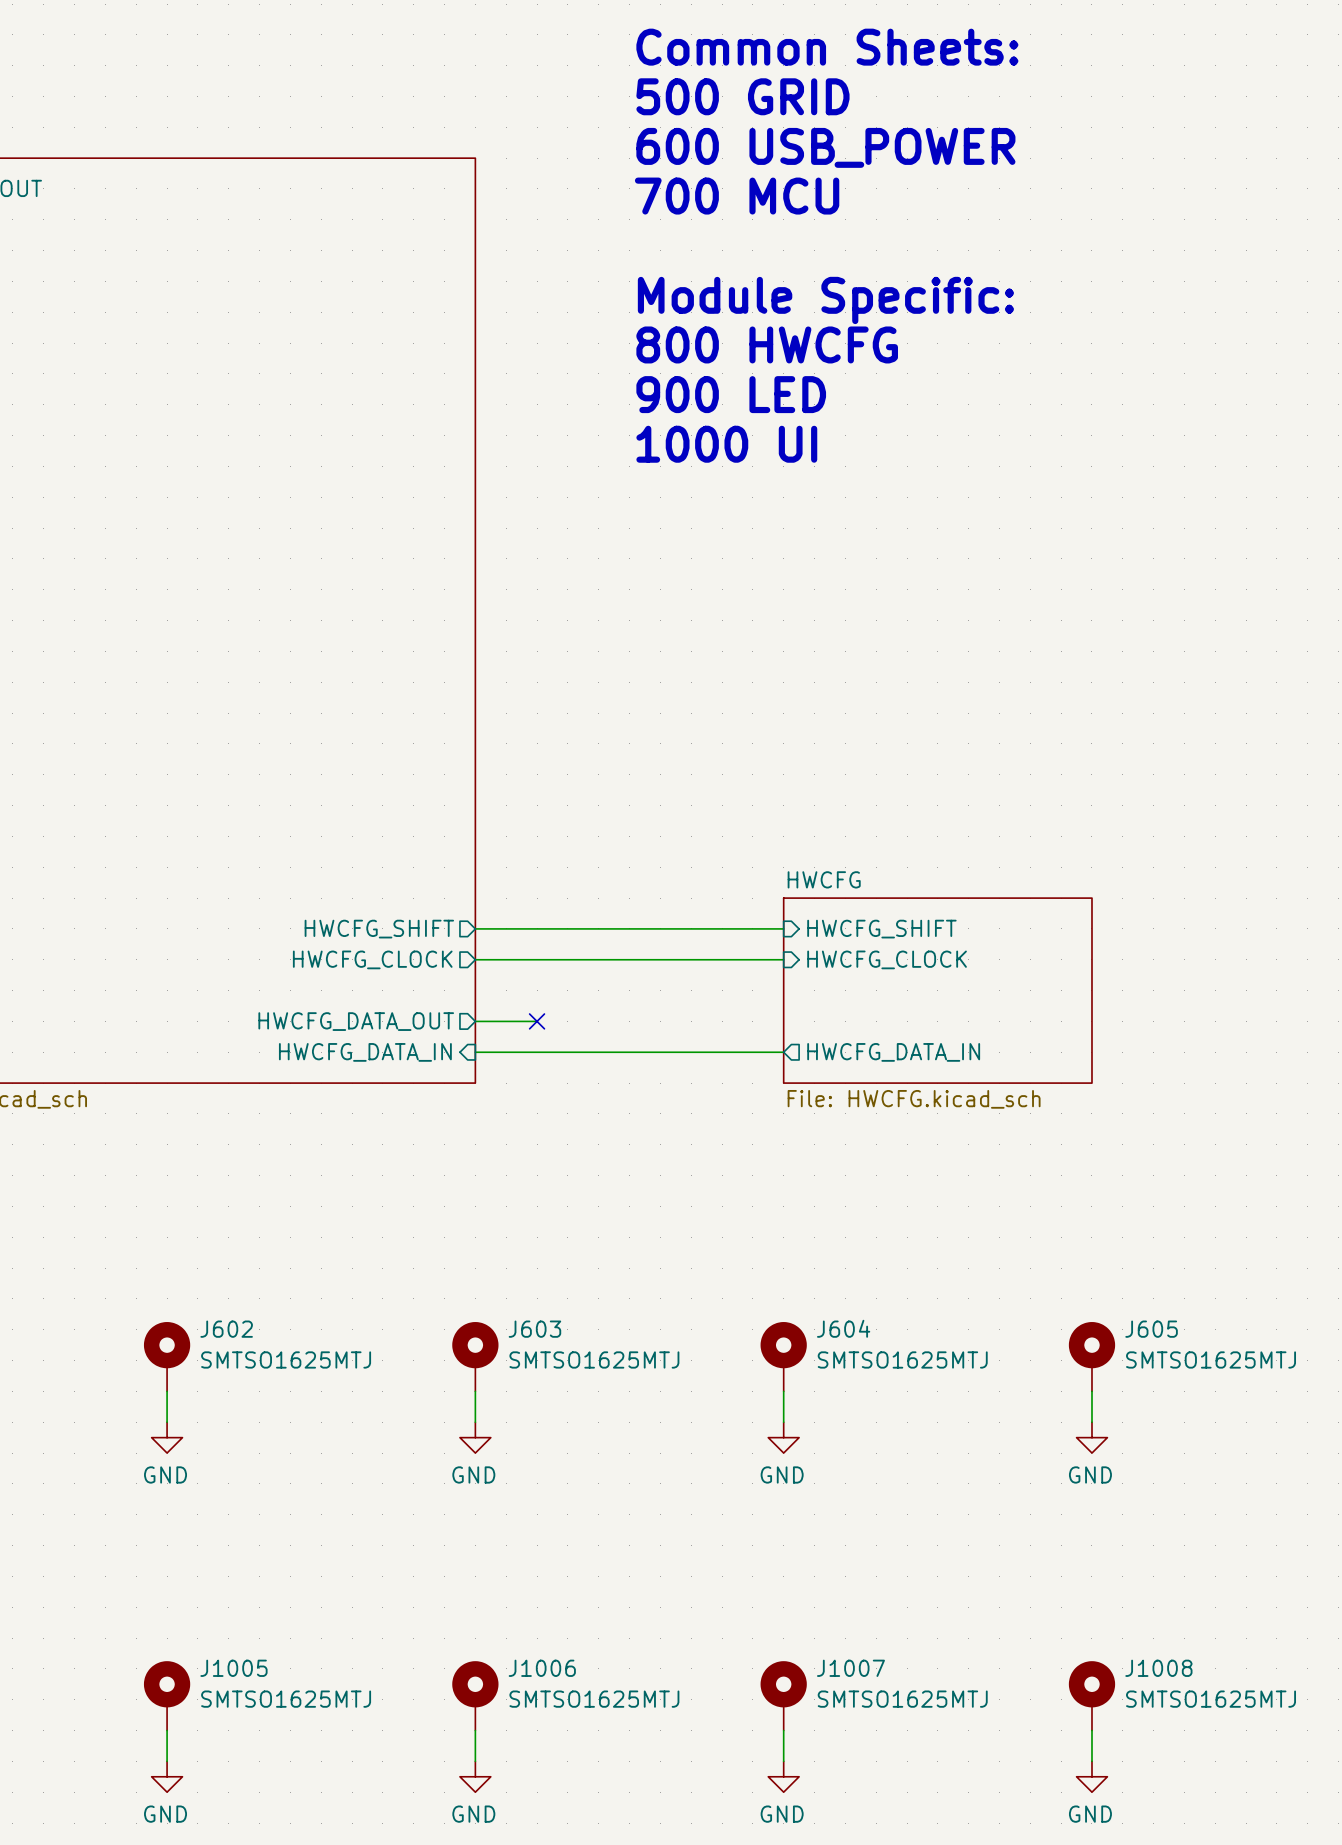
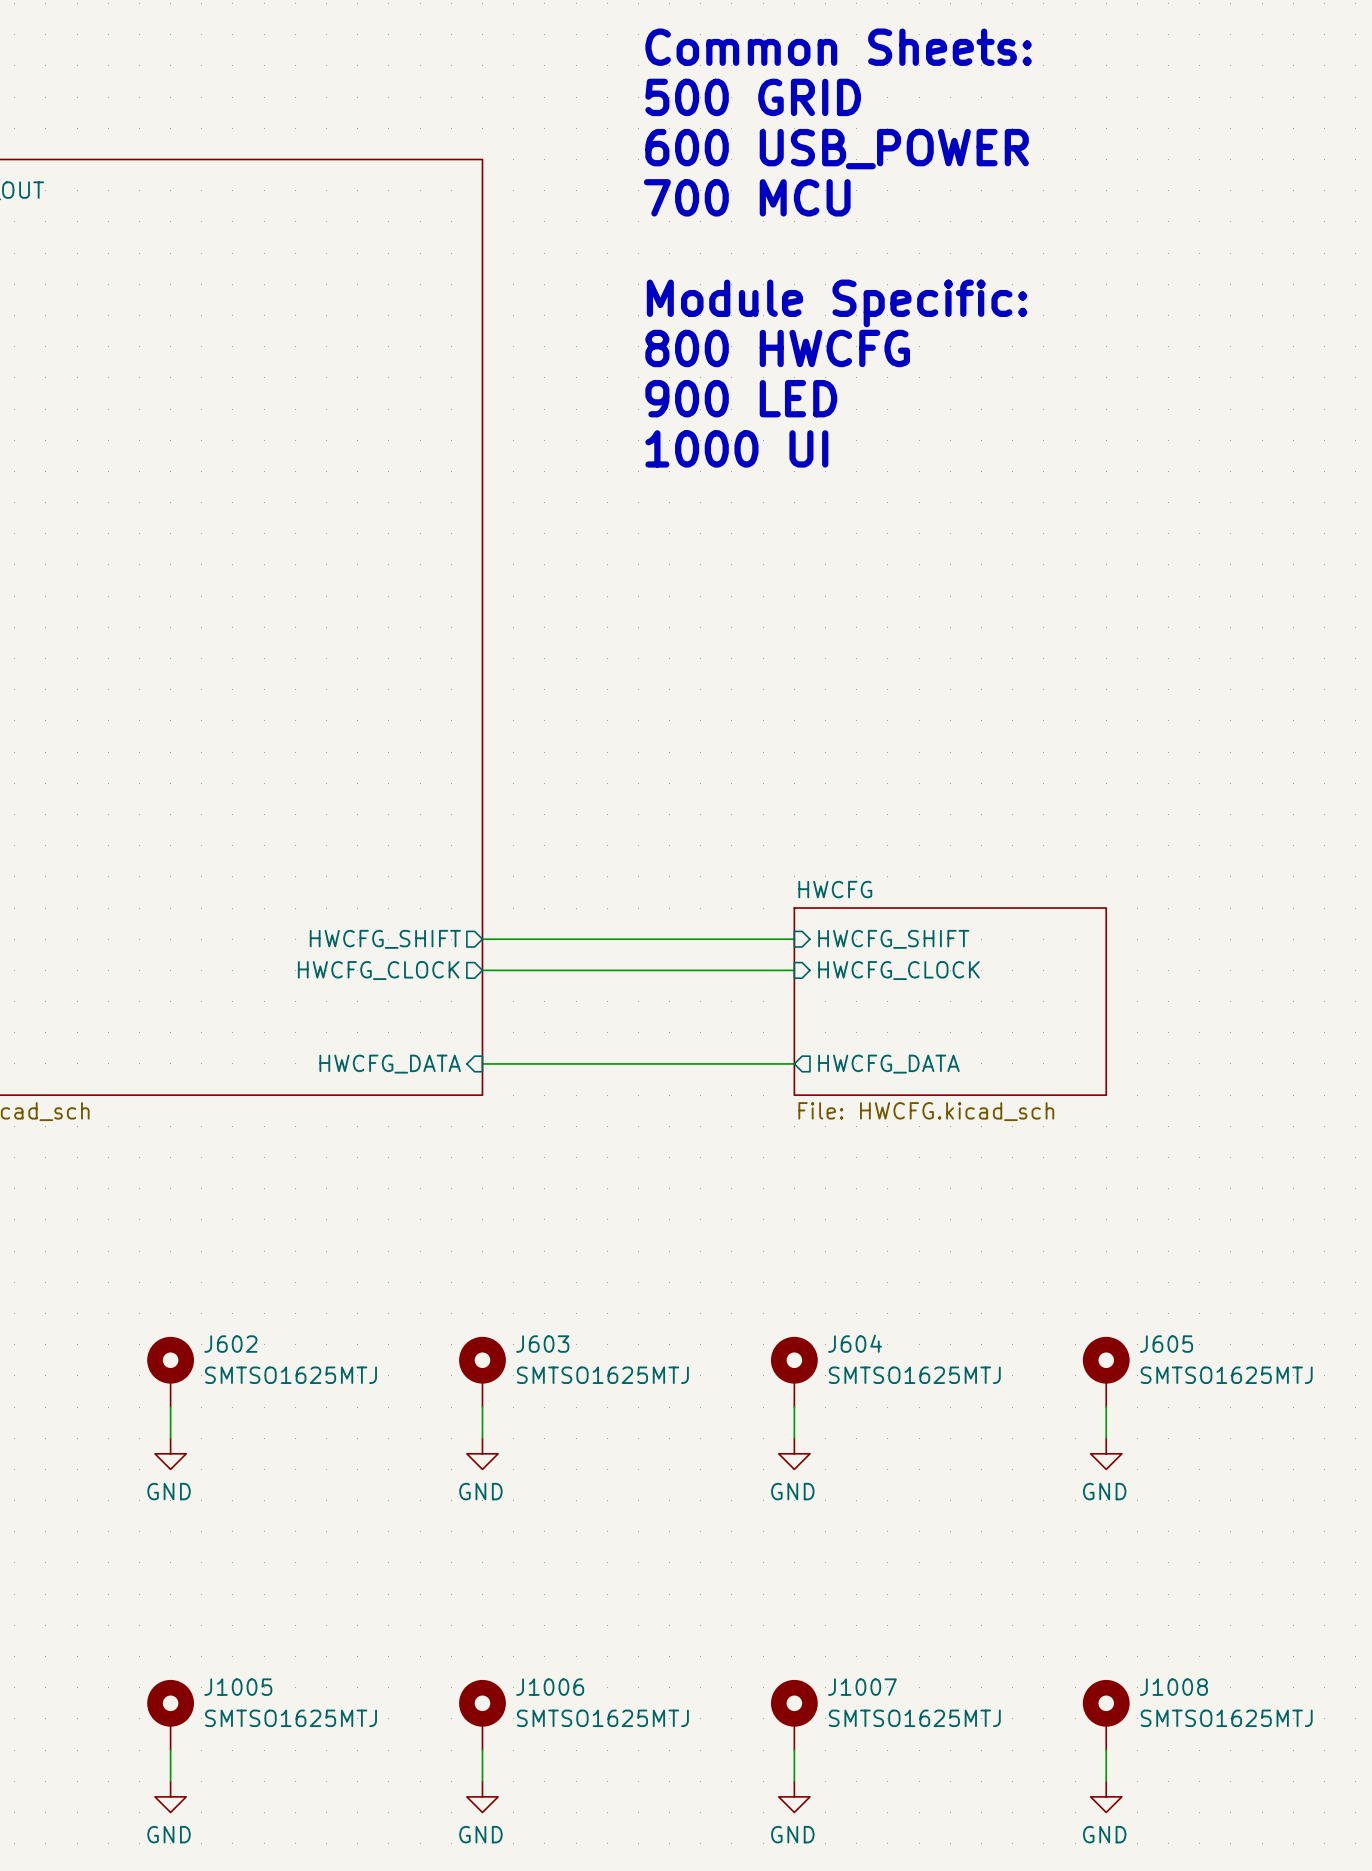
sheet pin: HWCFG_DATA_OUT (356, 1021) -> none
wire: (475, 1021) (537, 1021) -> none
no-connect mark: (537, 1021) -> none
sheet pin: HWCFG_DATA_IN (365, 1052) -> HWCFG_DATA (390, 1064)
sheet pin: HWCFG_DATA_IN (893, 1052) -> HWCFG_DATA (888, 1064)

